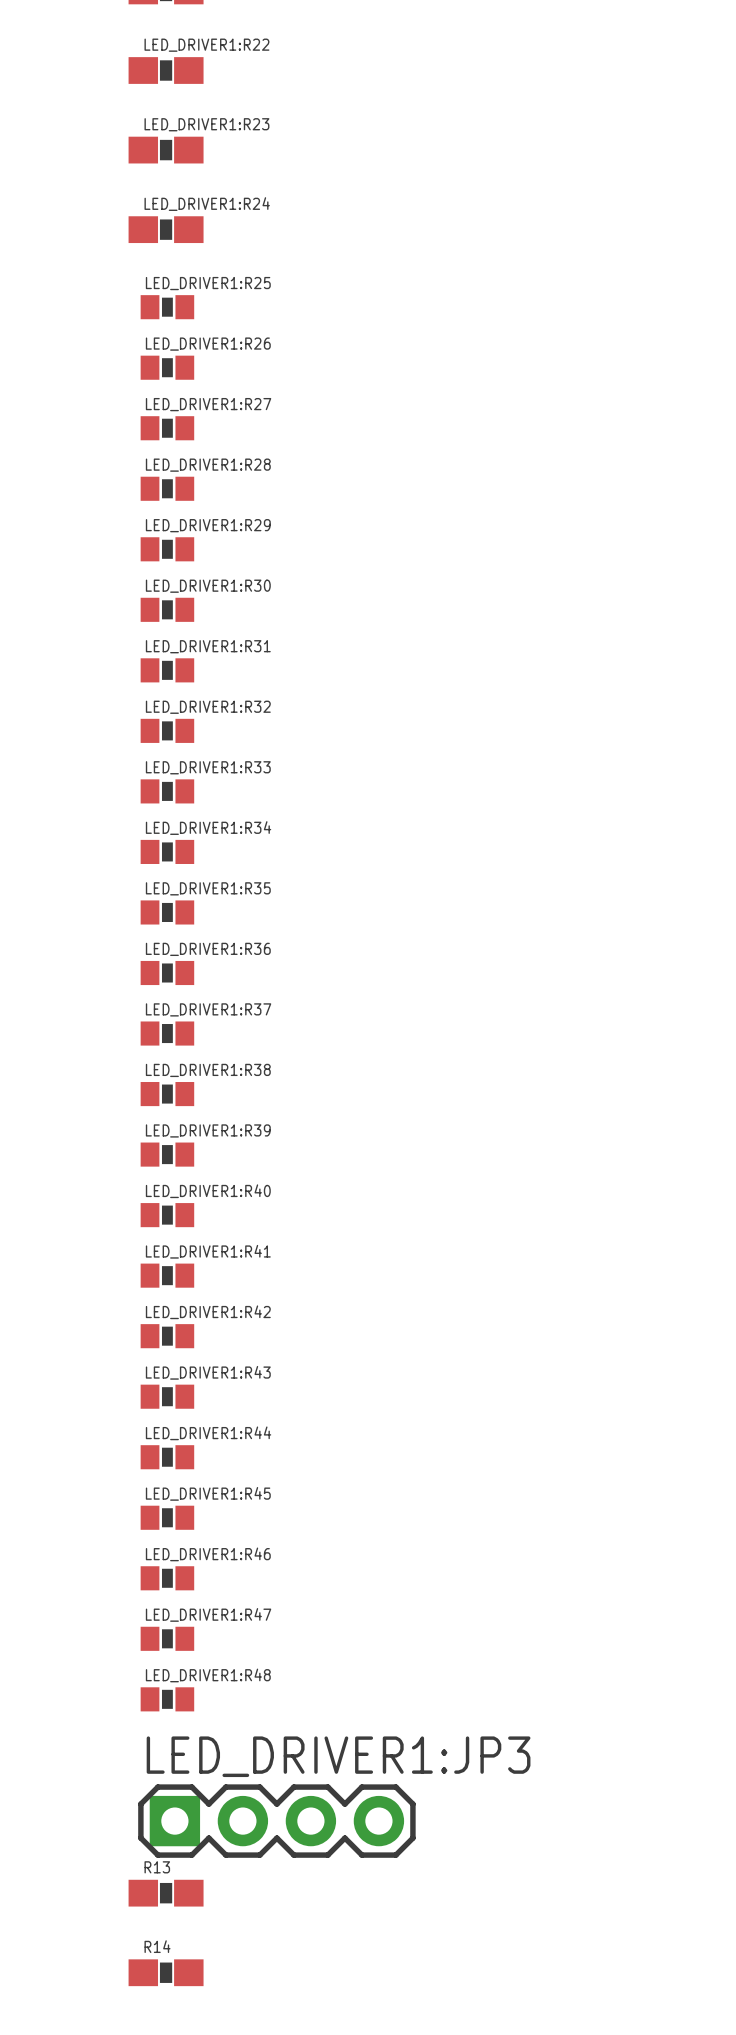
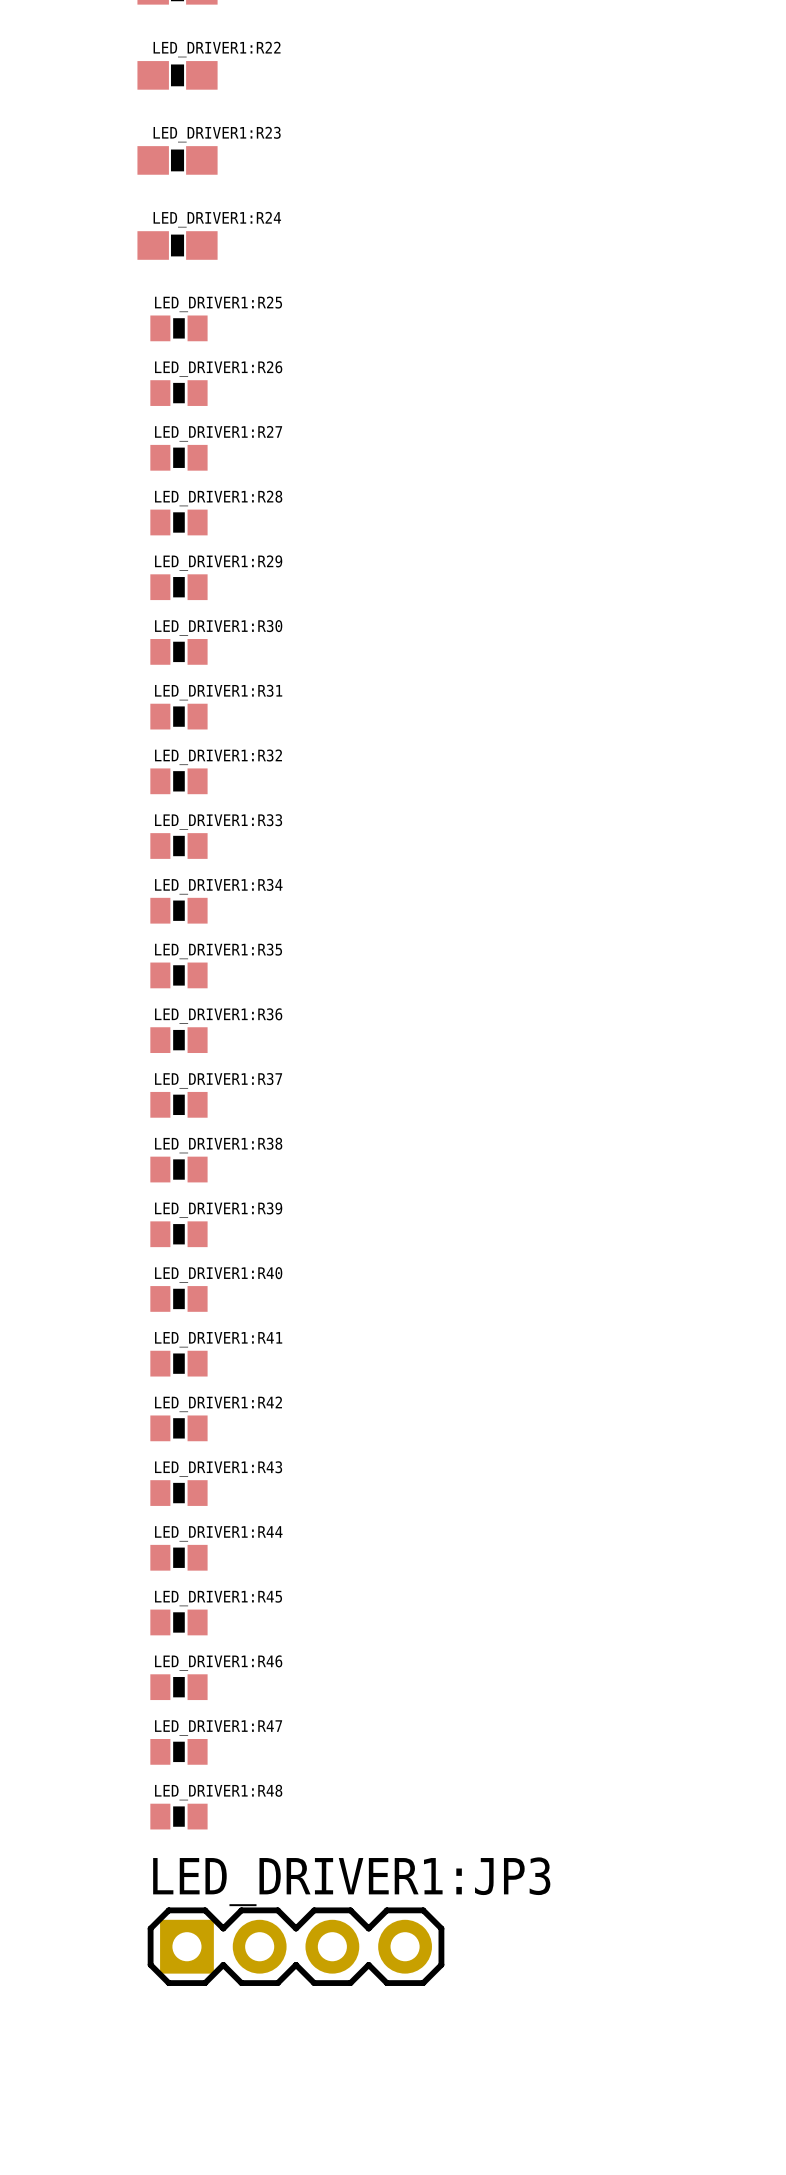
R13: (166, 1893) -> none
R14: (166, 1972) -> none

